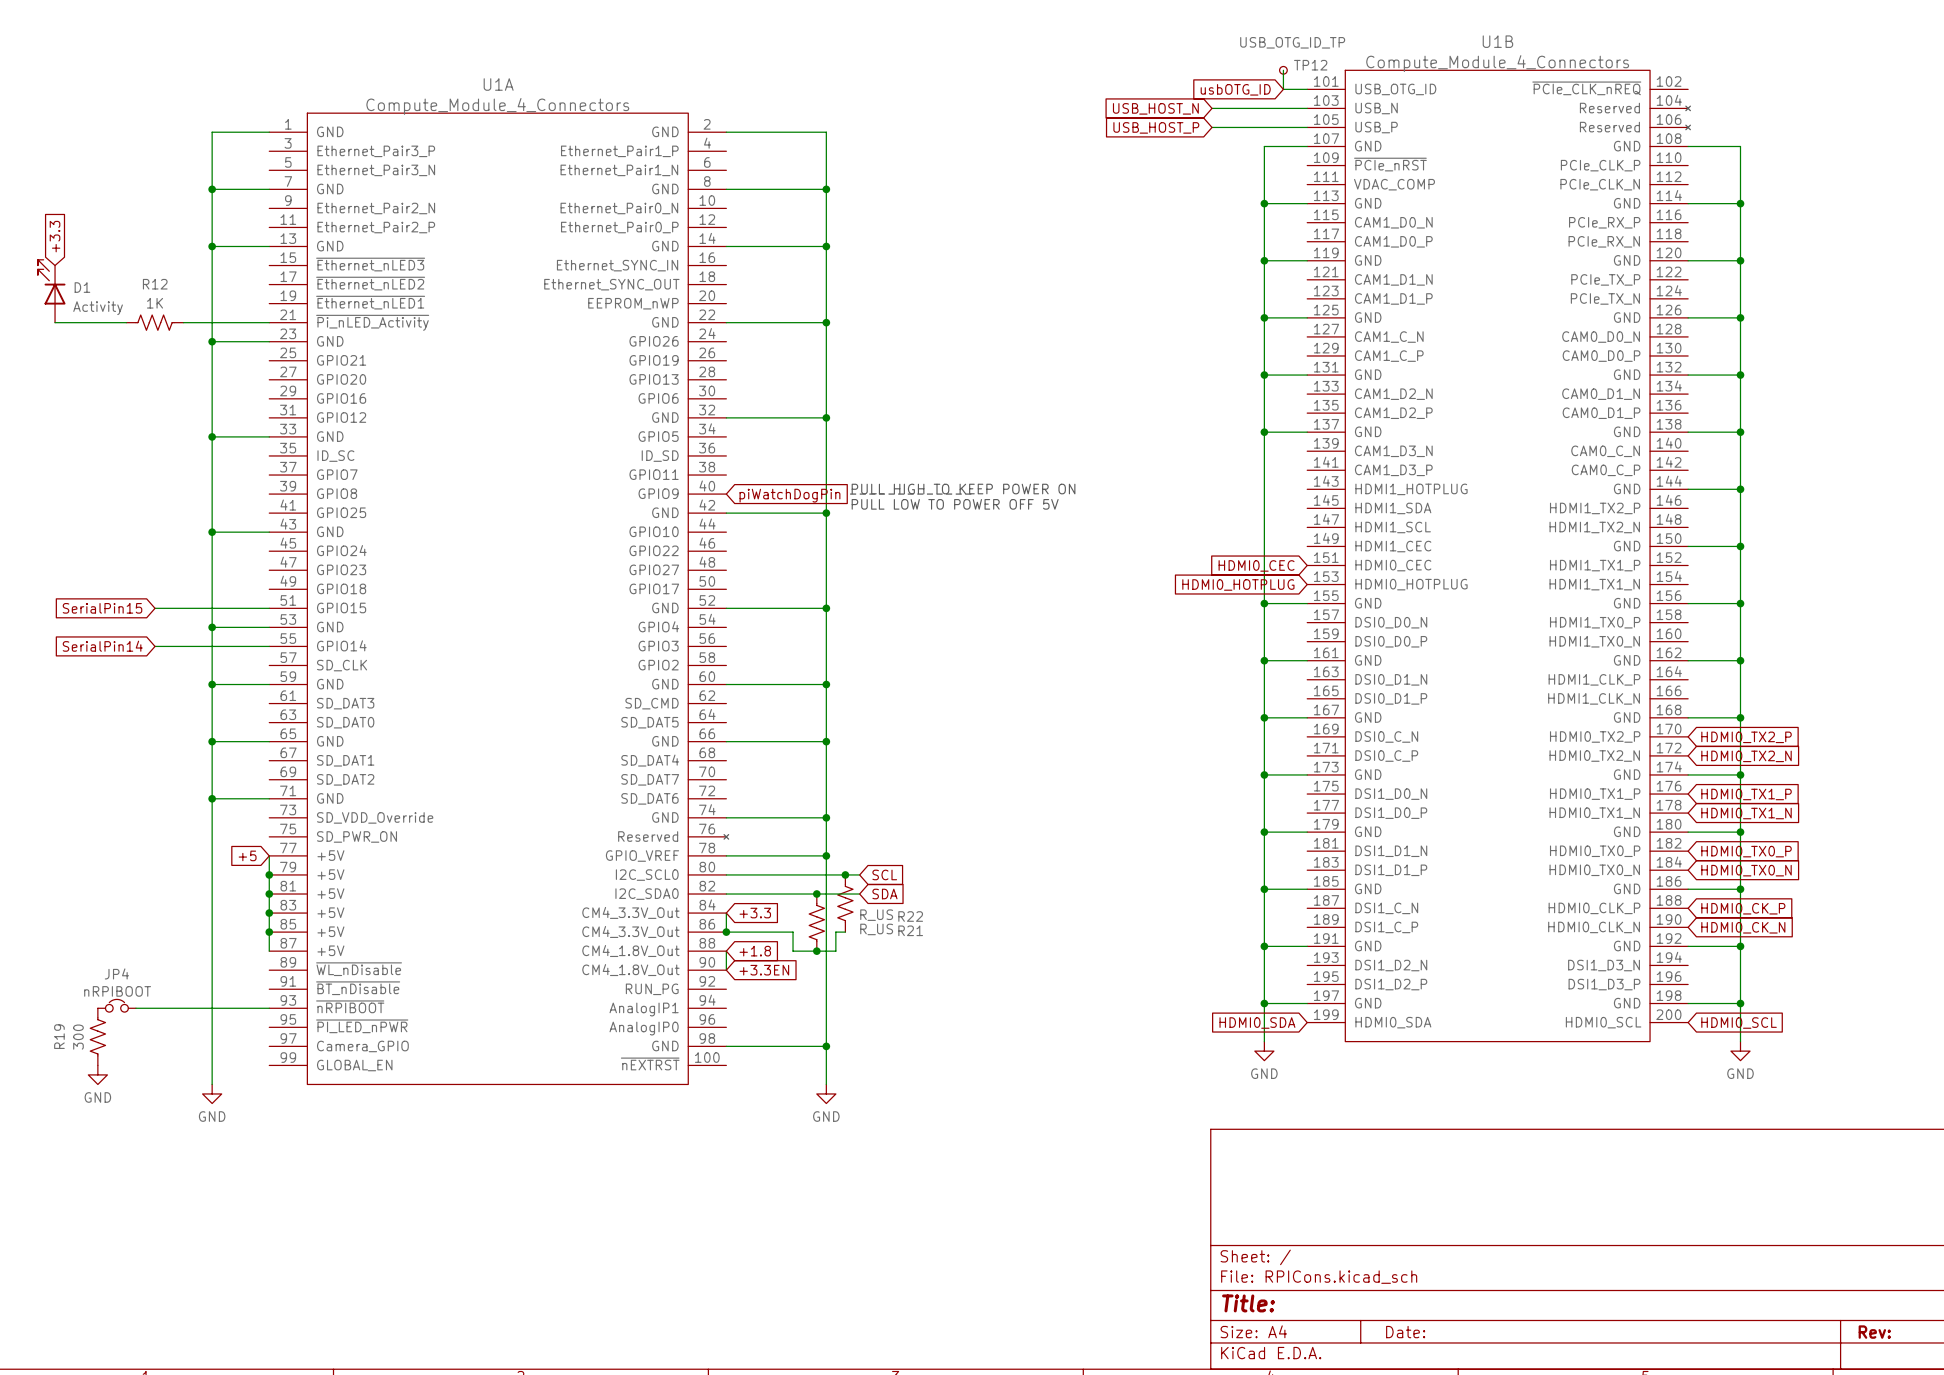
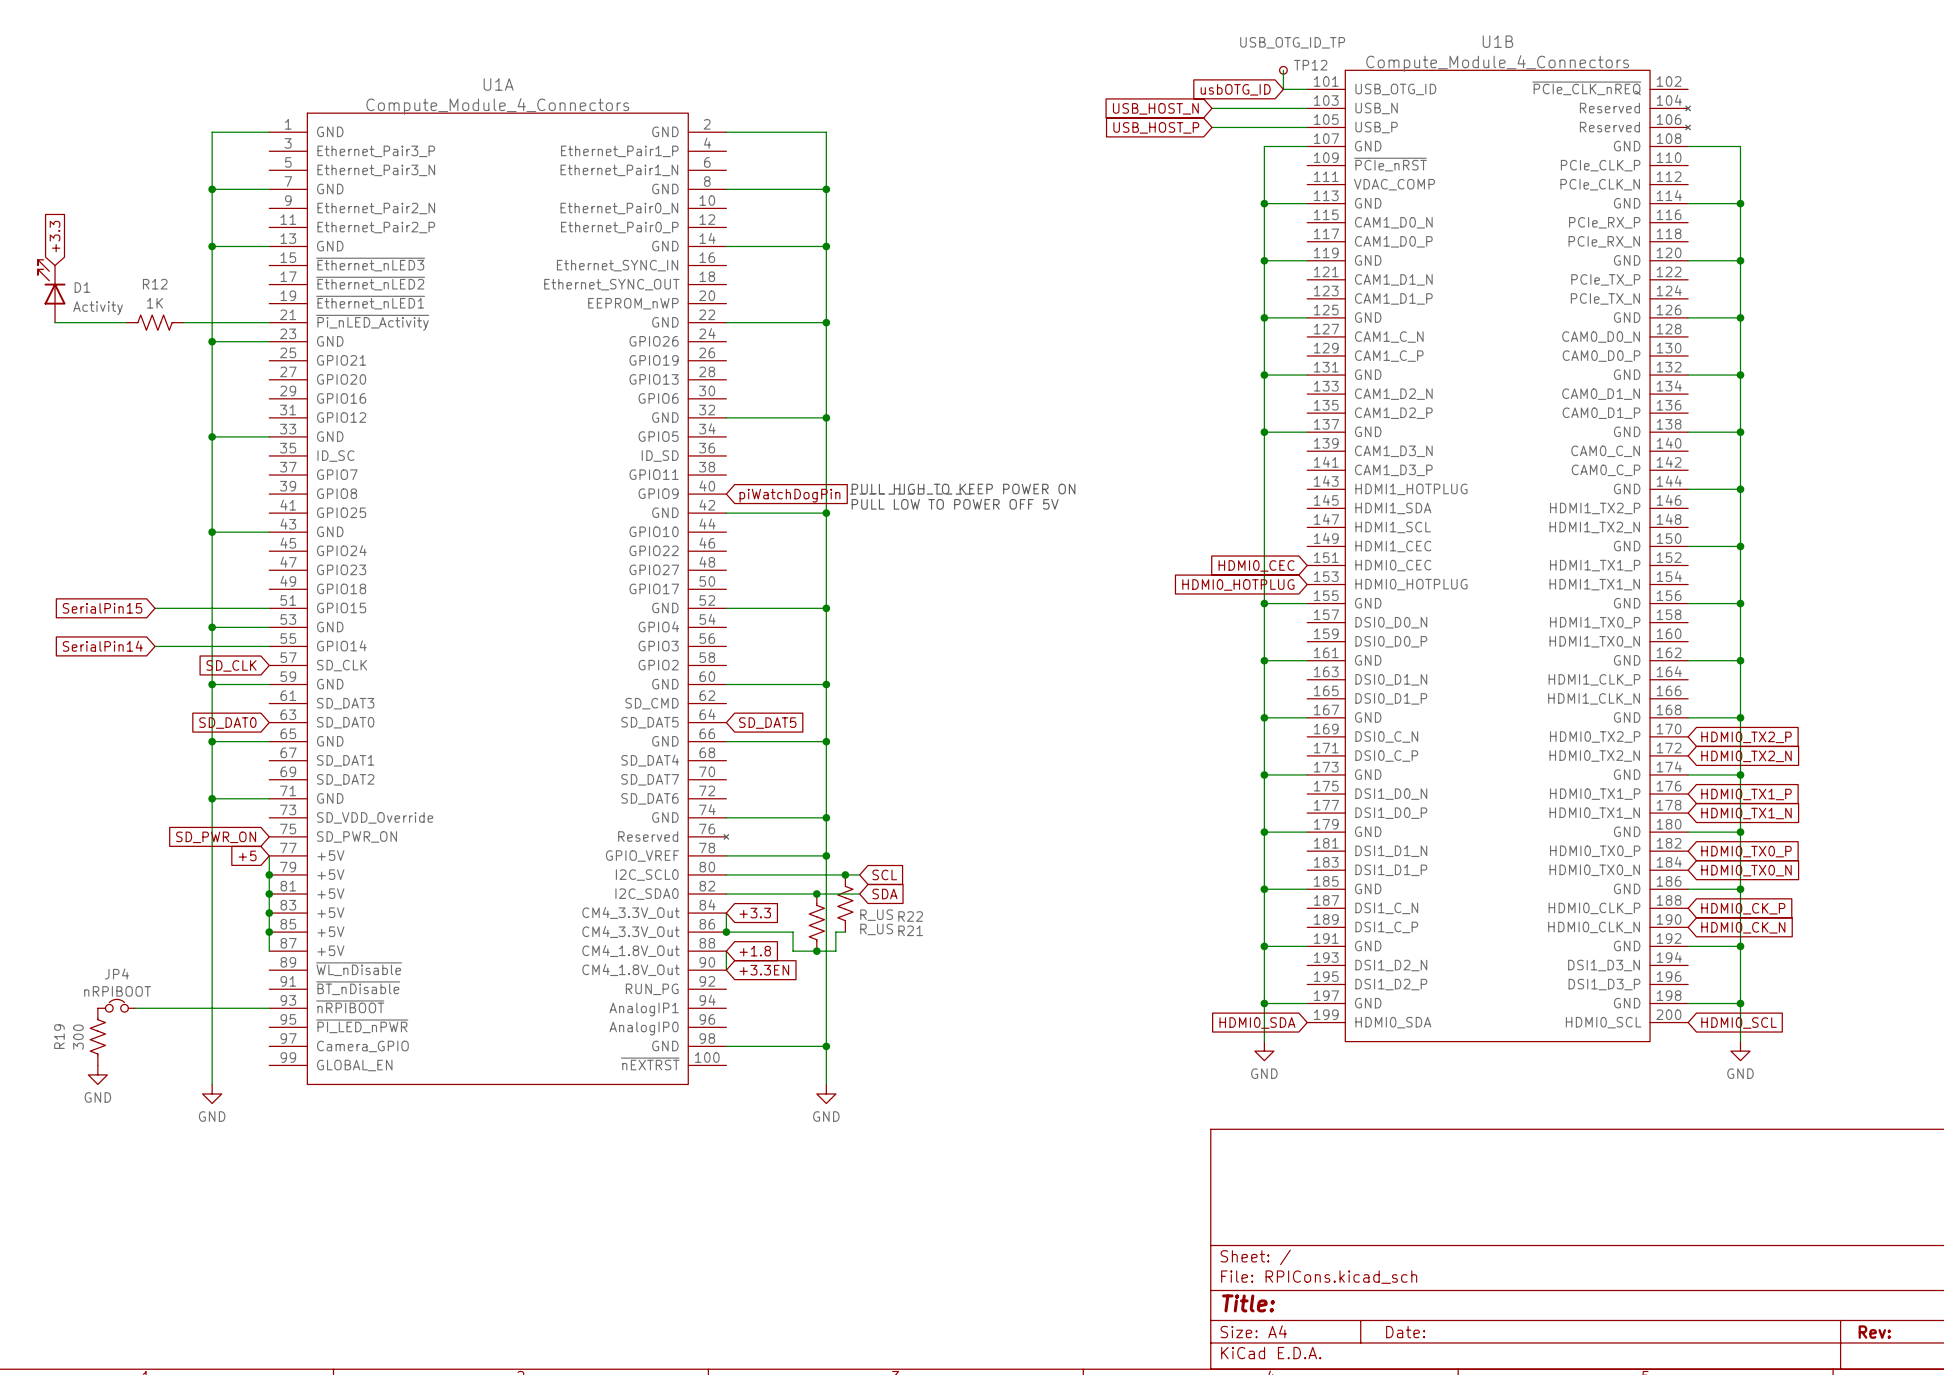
global label: none -> SD_CLK (231, 665)
global label: none -> SD_DAT0 (227, 723)
global label: none -> SD_DAT5 (767, 723)
global label: none -> SD_PWR_ON (216, 837)

